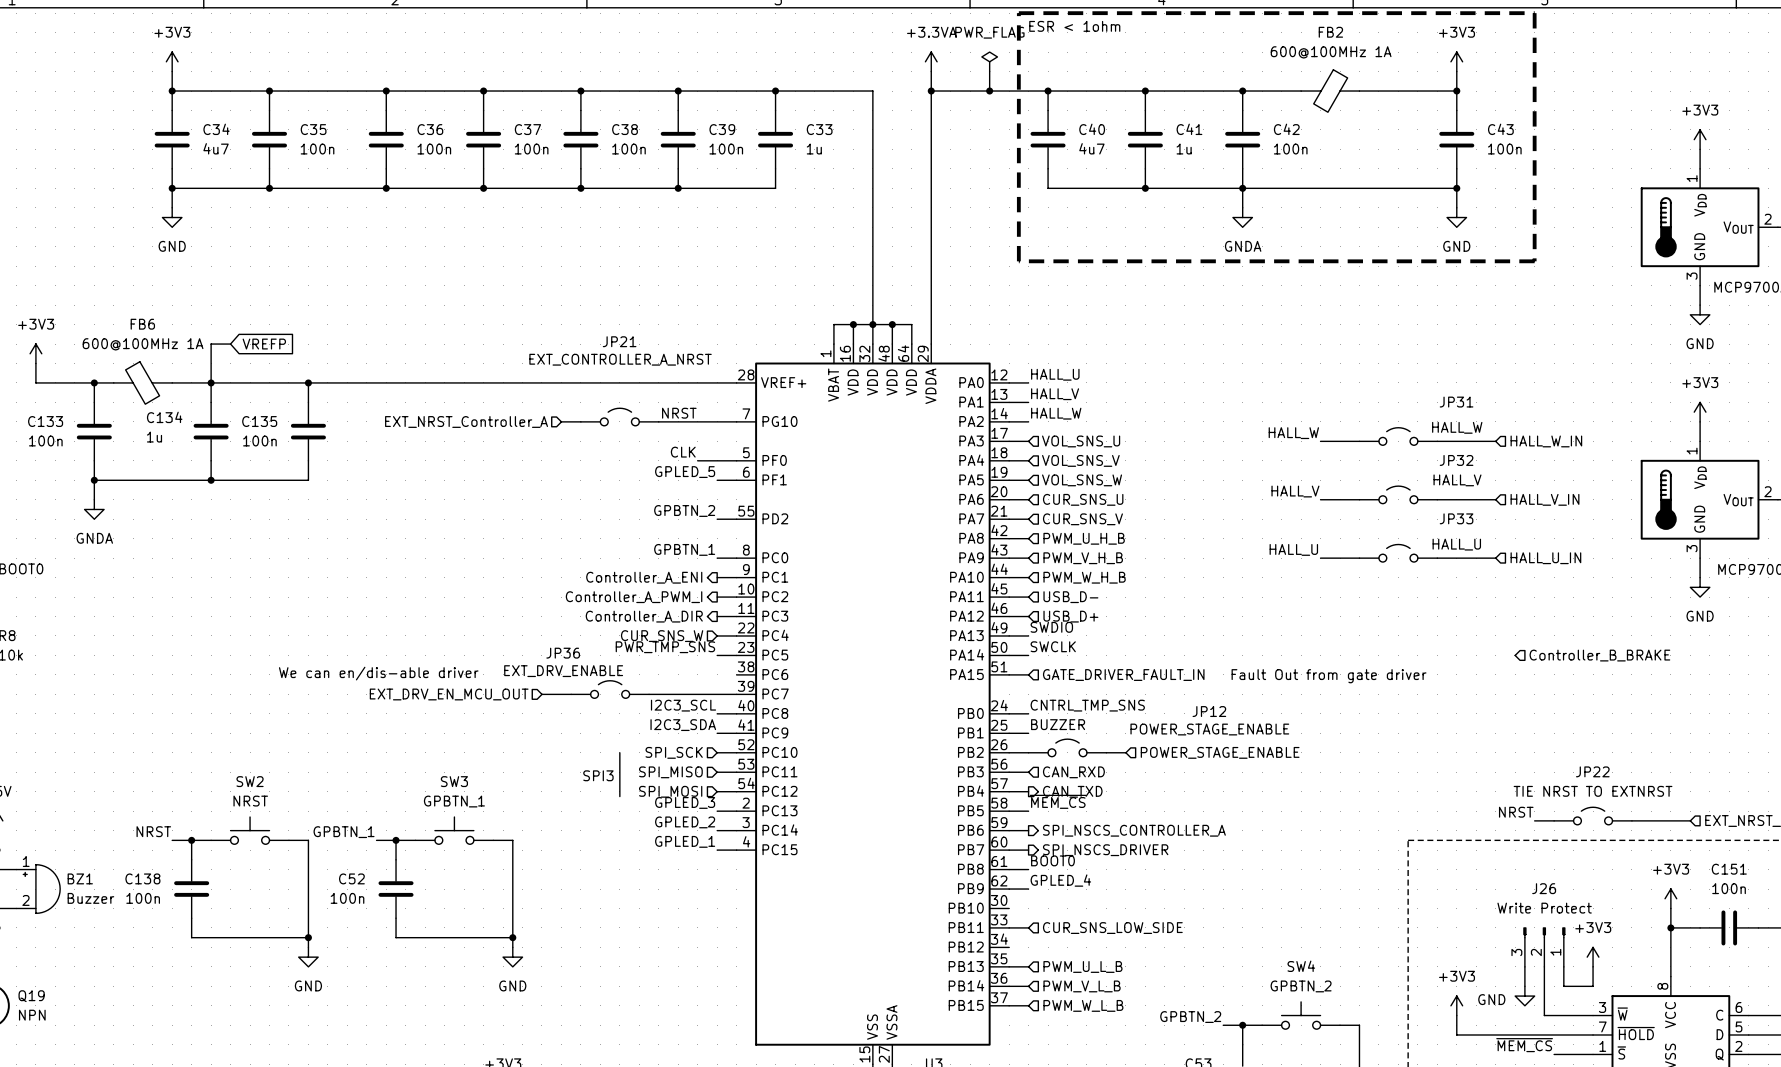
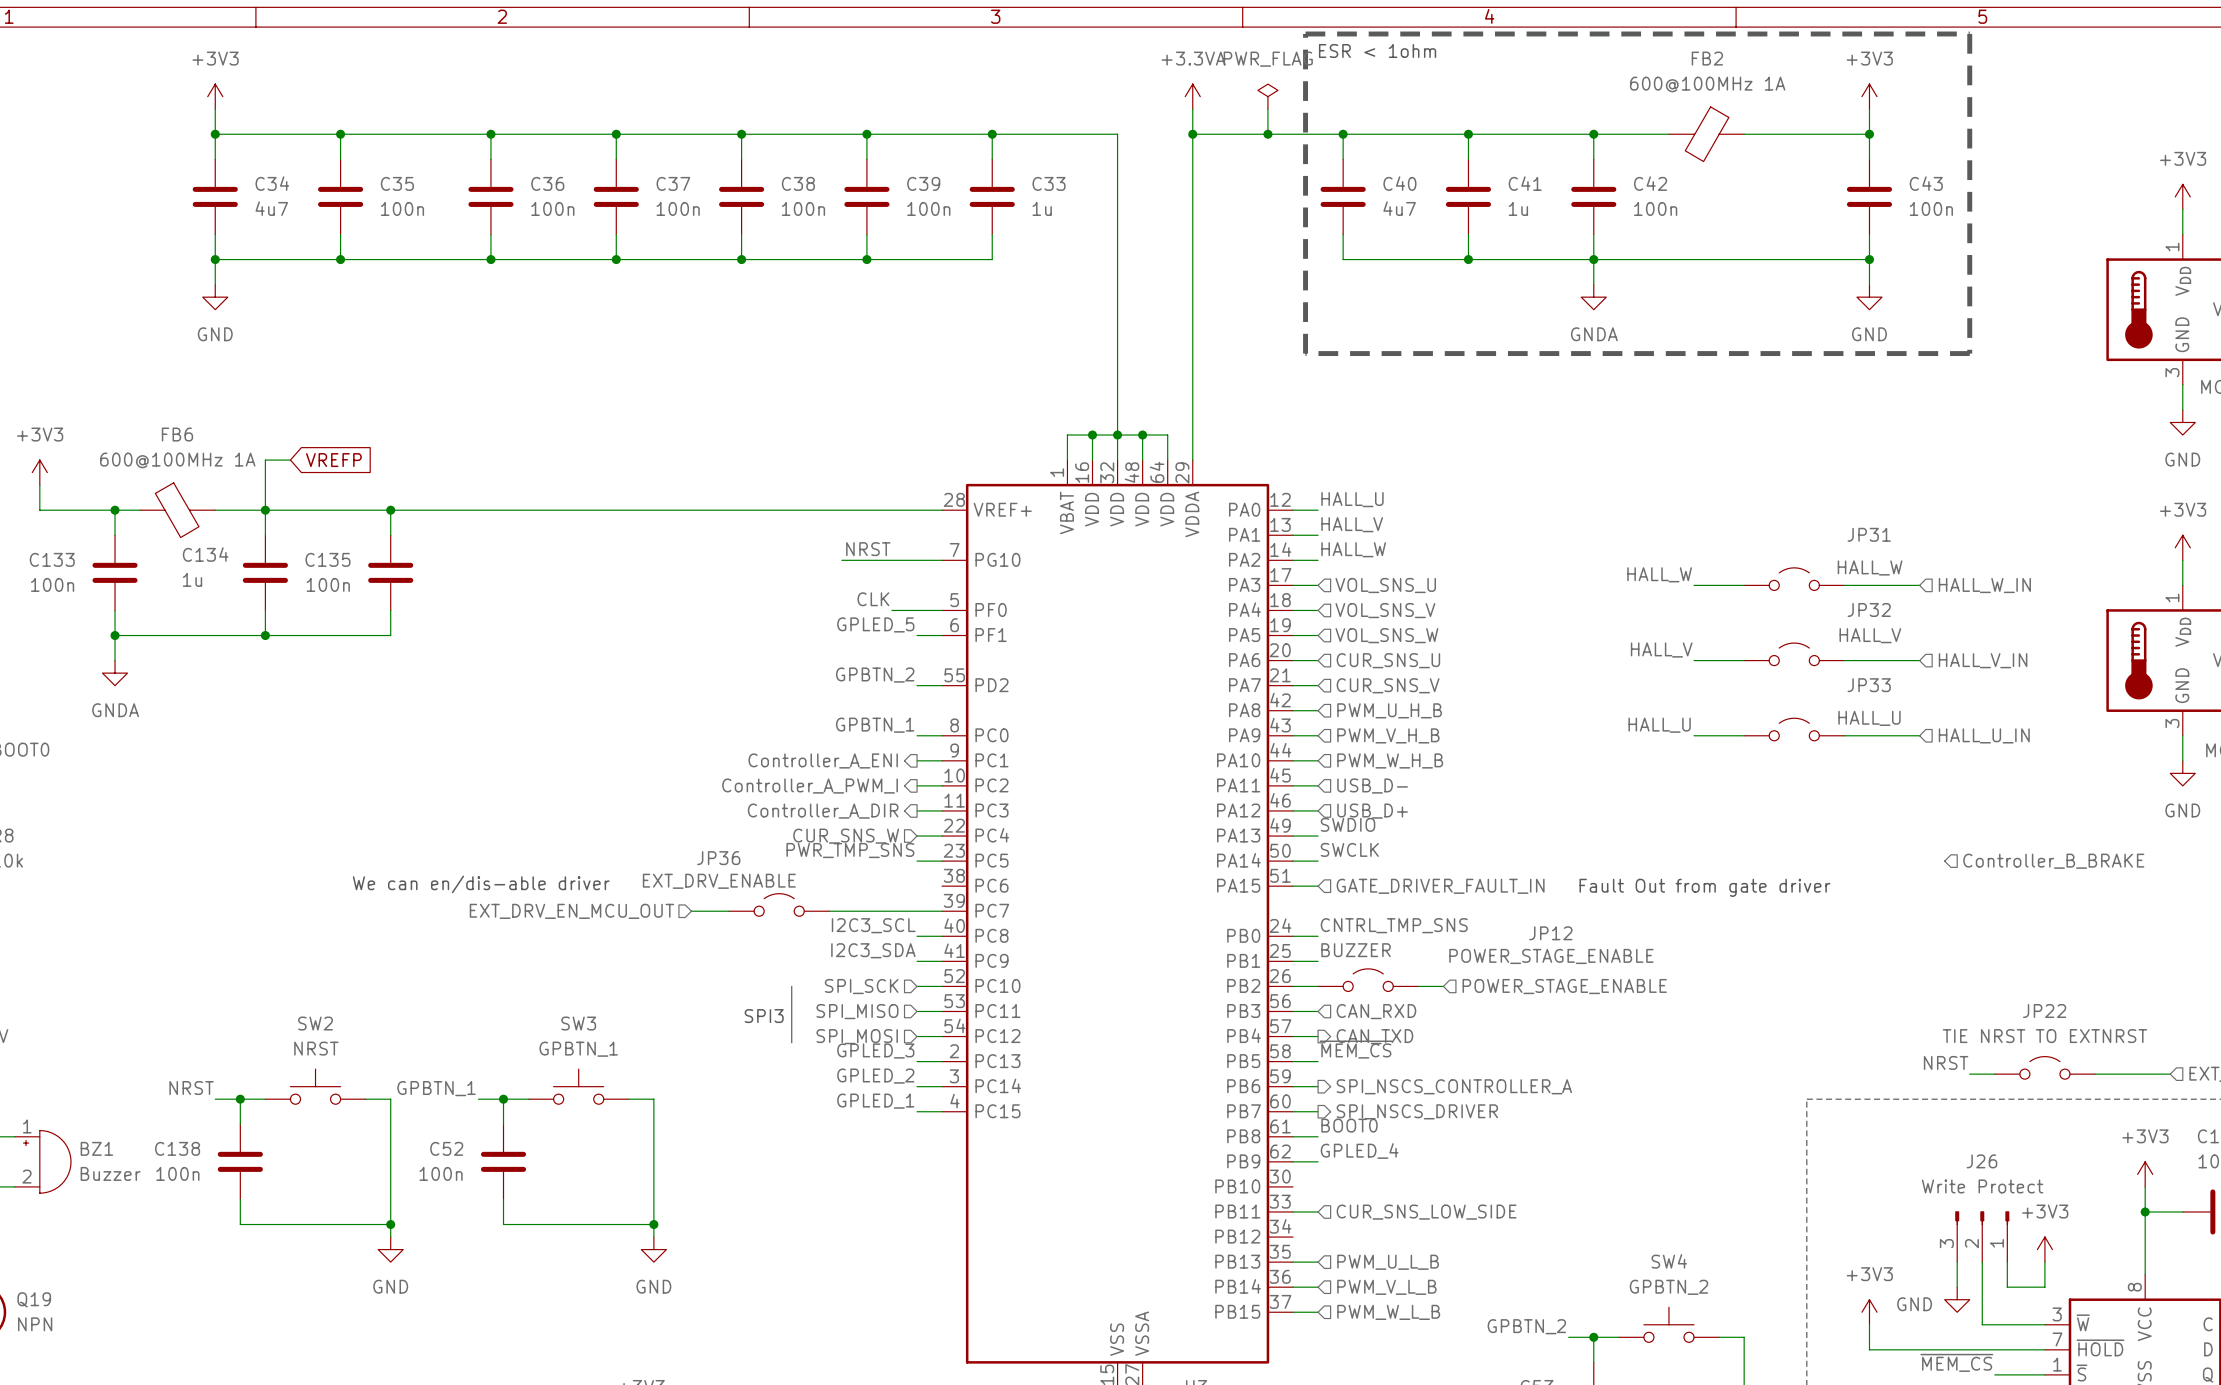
JP21: EXT_CONTROLLER_A_NRST (619, 417) -> none
hierarchical label: EXT_NRST_Controller_A (466, 421) -> none
wire: (561, 421) (580, 421) -> none

